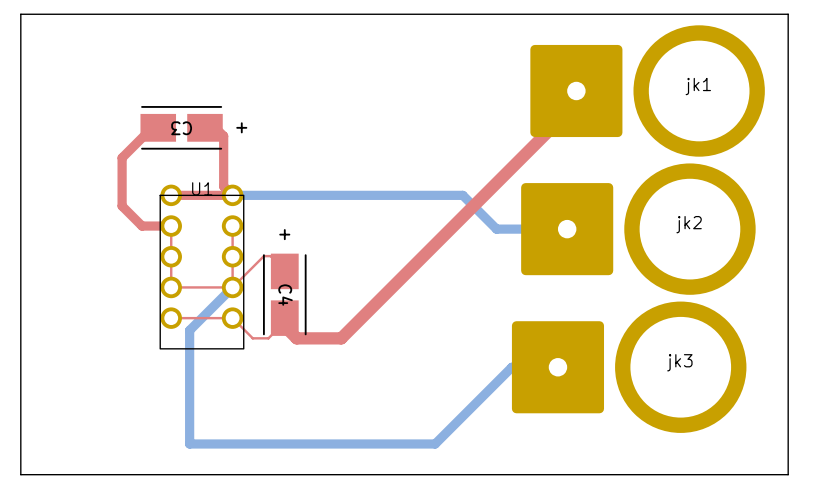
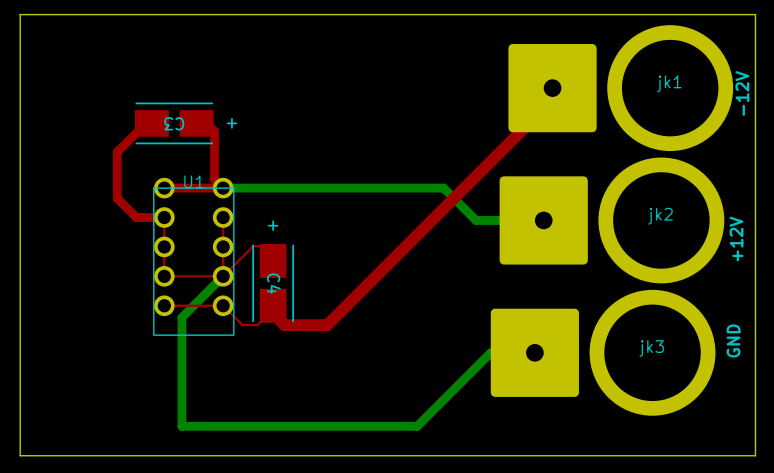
text: none -> -12V (742, 93)
text: none -> +12V (736, 239)
text: none -> GND (733, 340)

